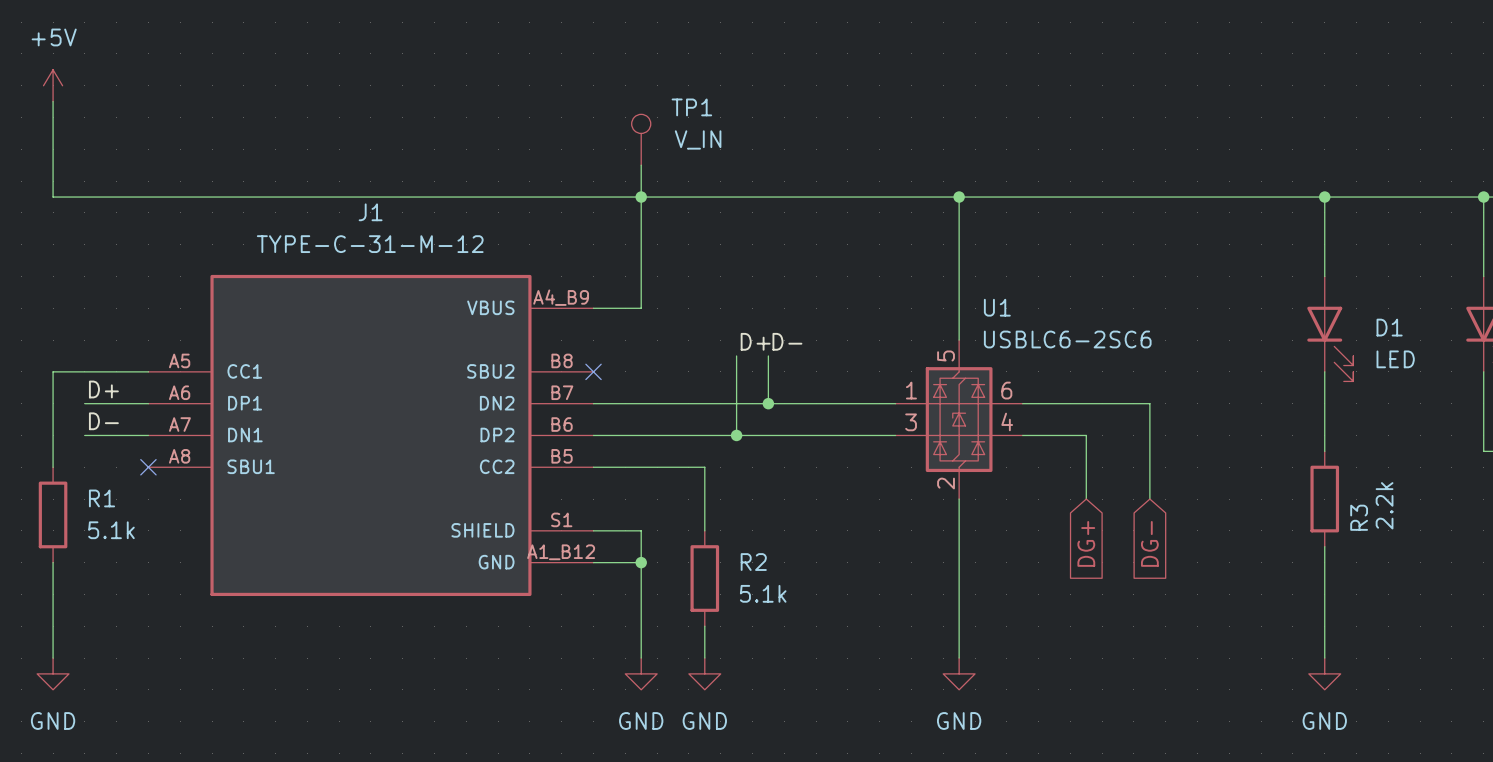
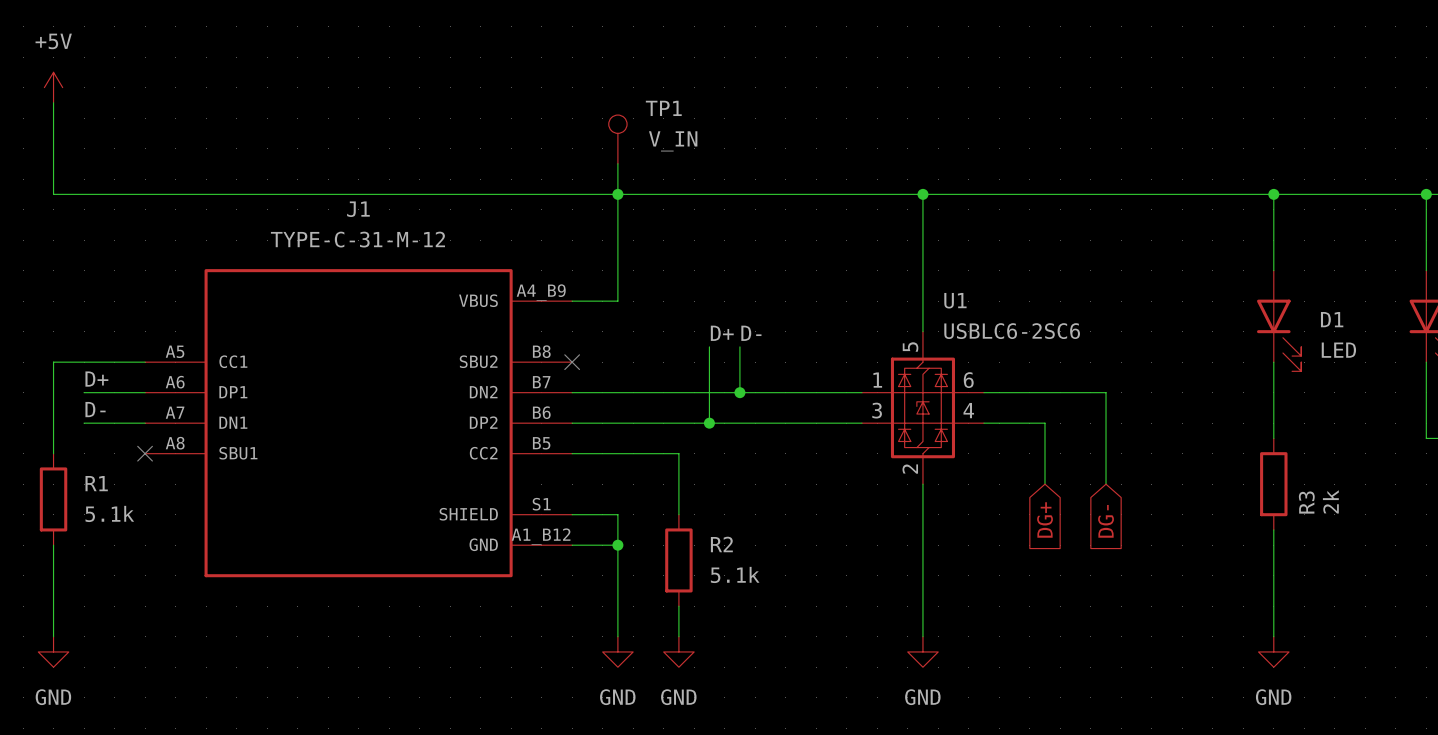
R3 value: 2.2k (1384, 505) -> 2k (1330, 501)

